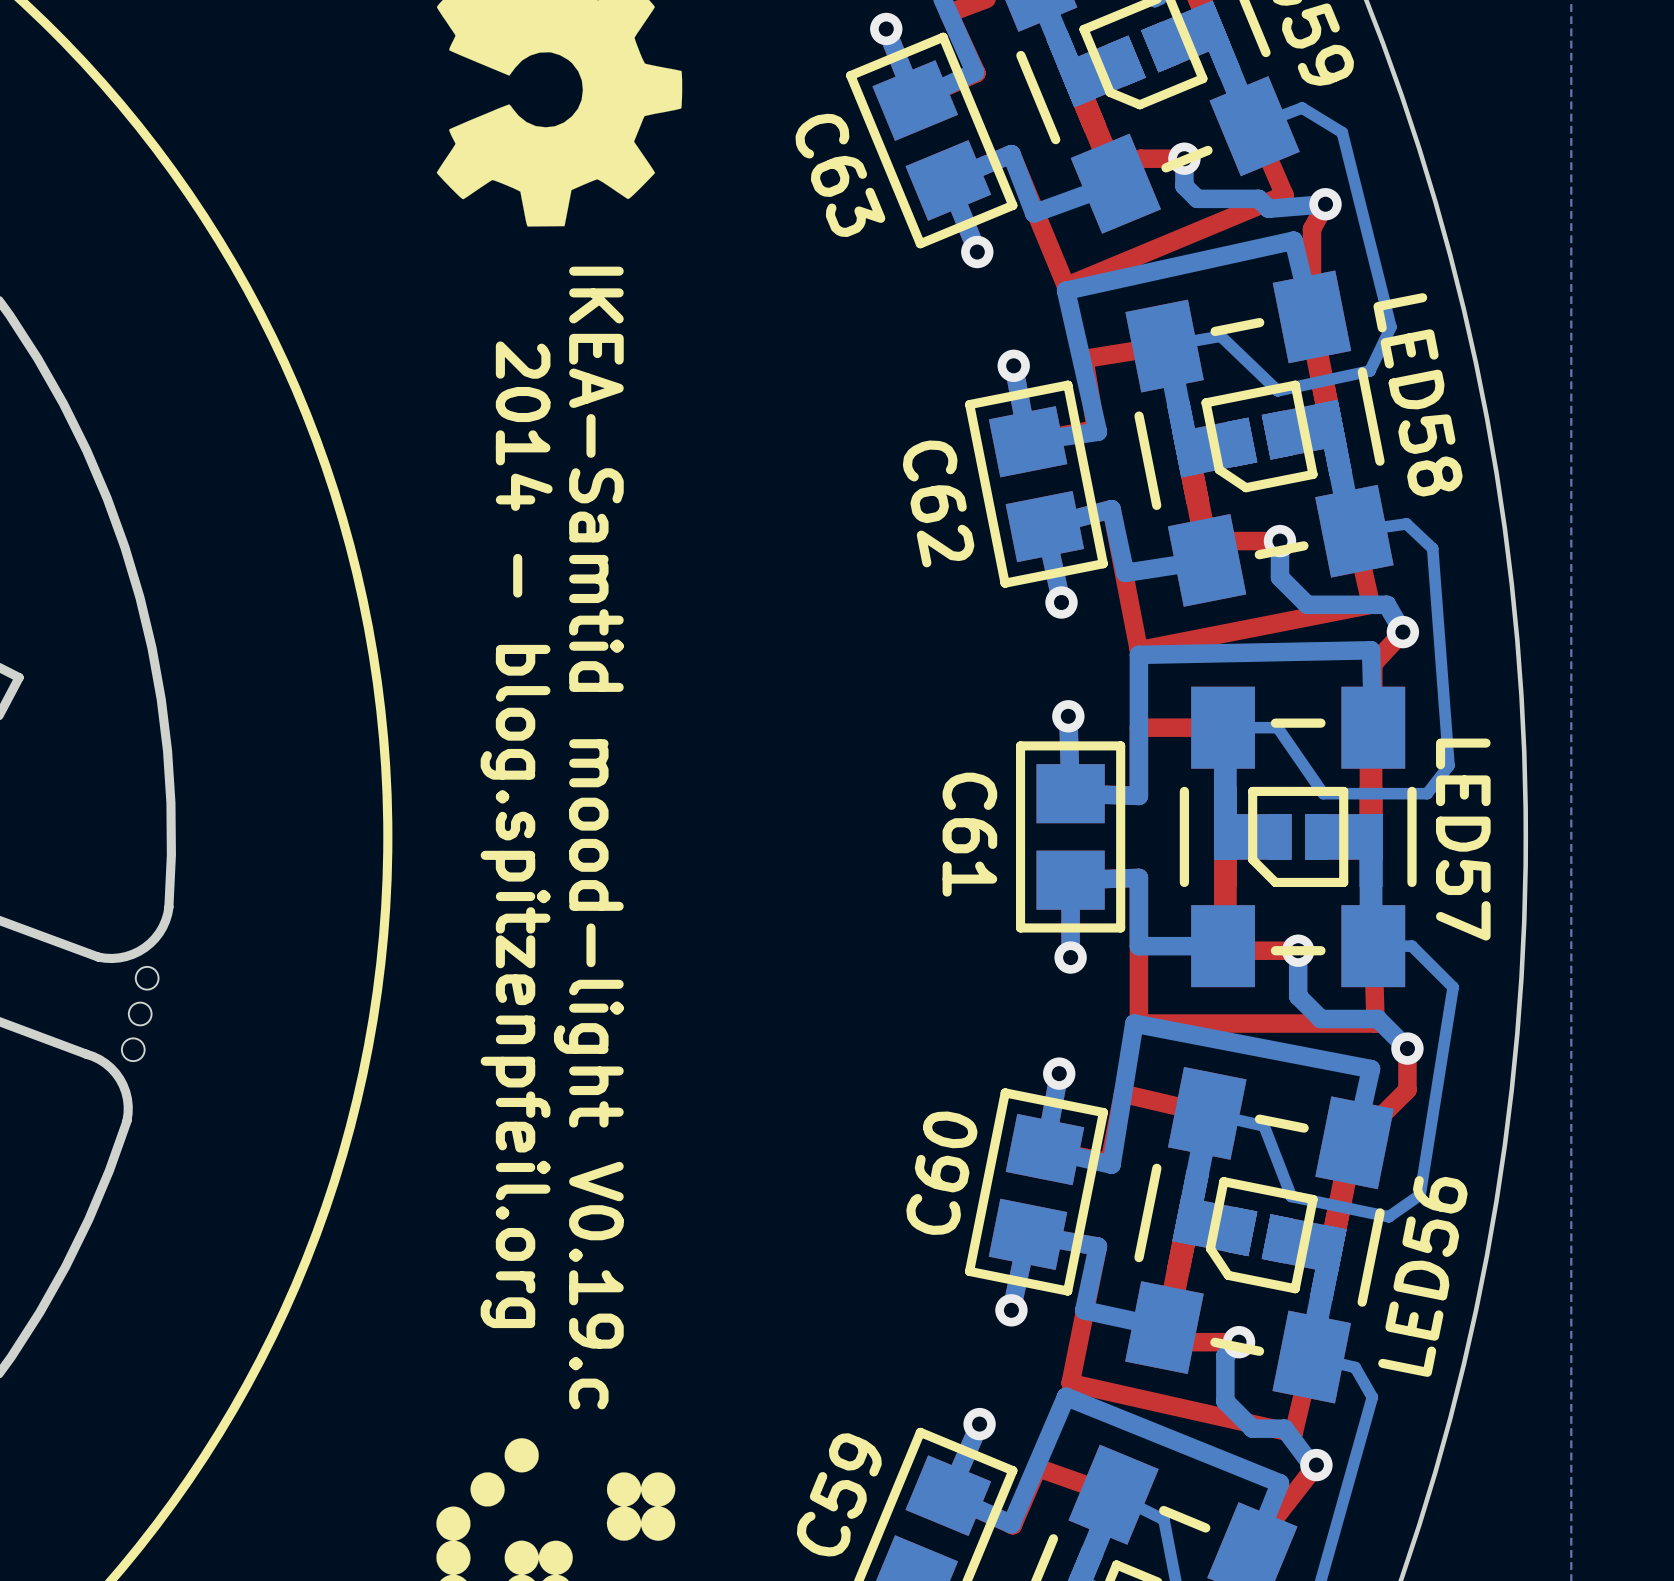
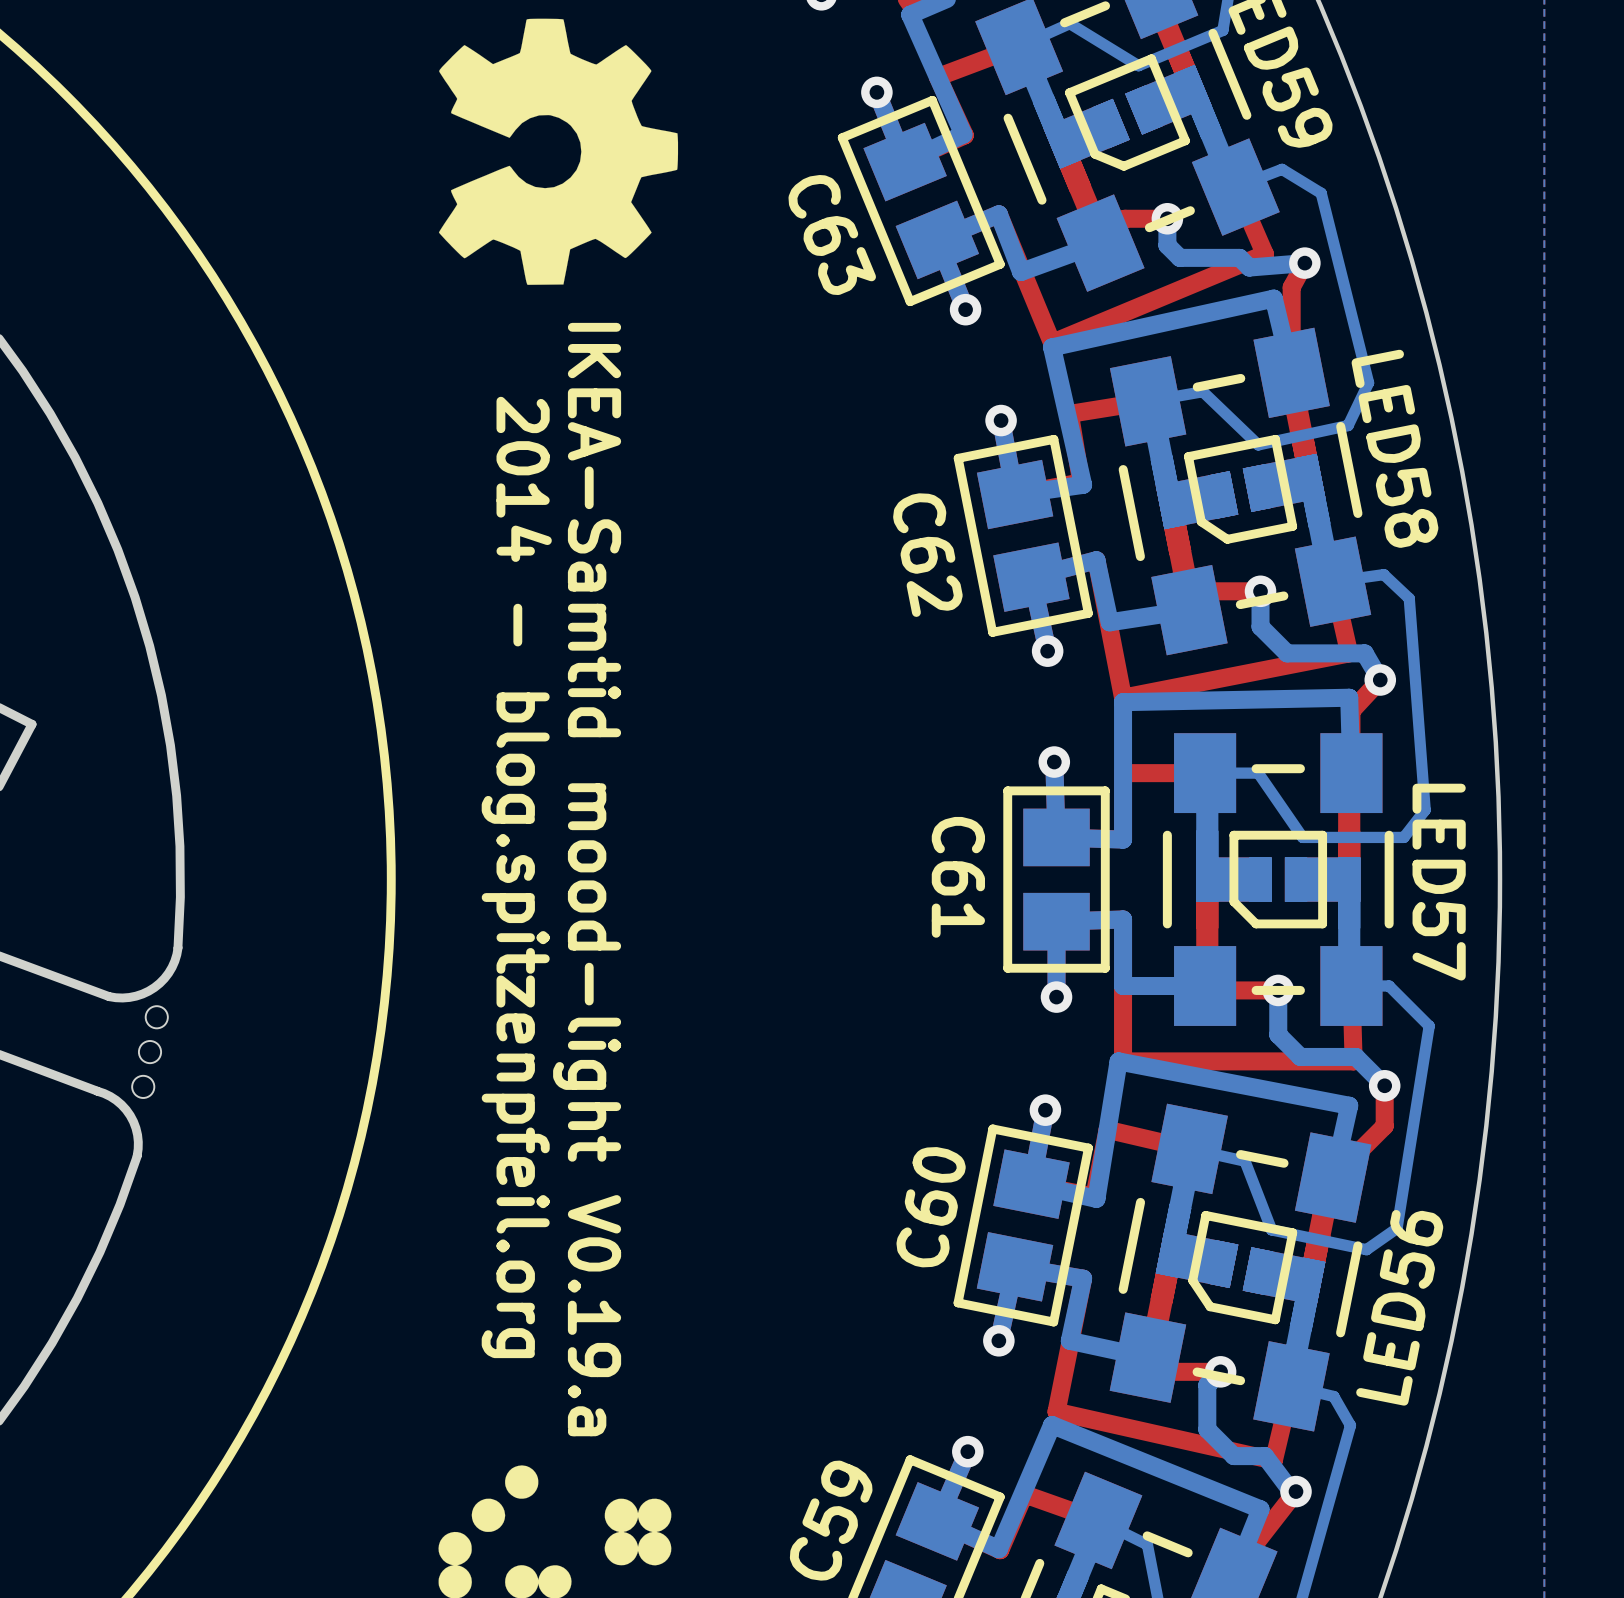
text: IKEA-Samtid mood-light V0.19.c (588, 838) -> IKEA-Samtid mood-light V0.19.a (587, 879)

